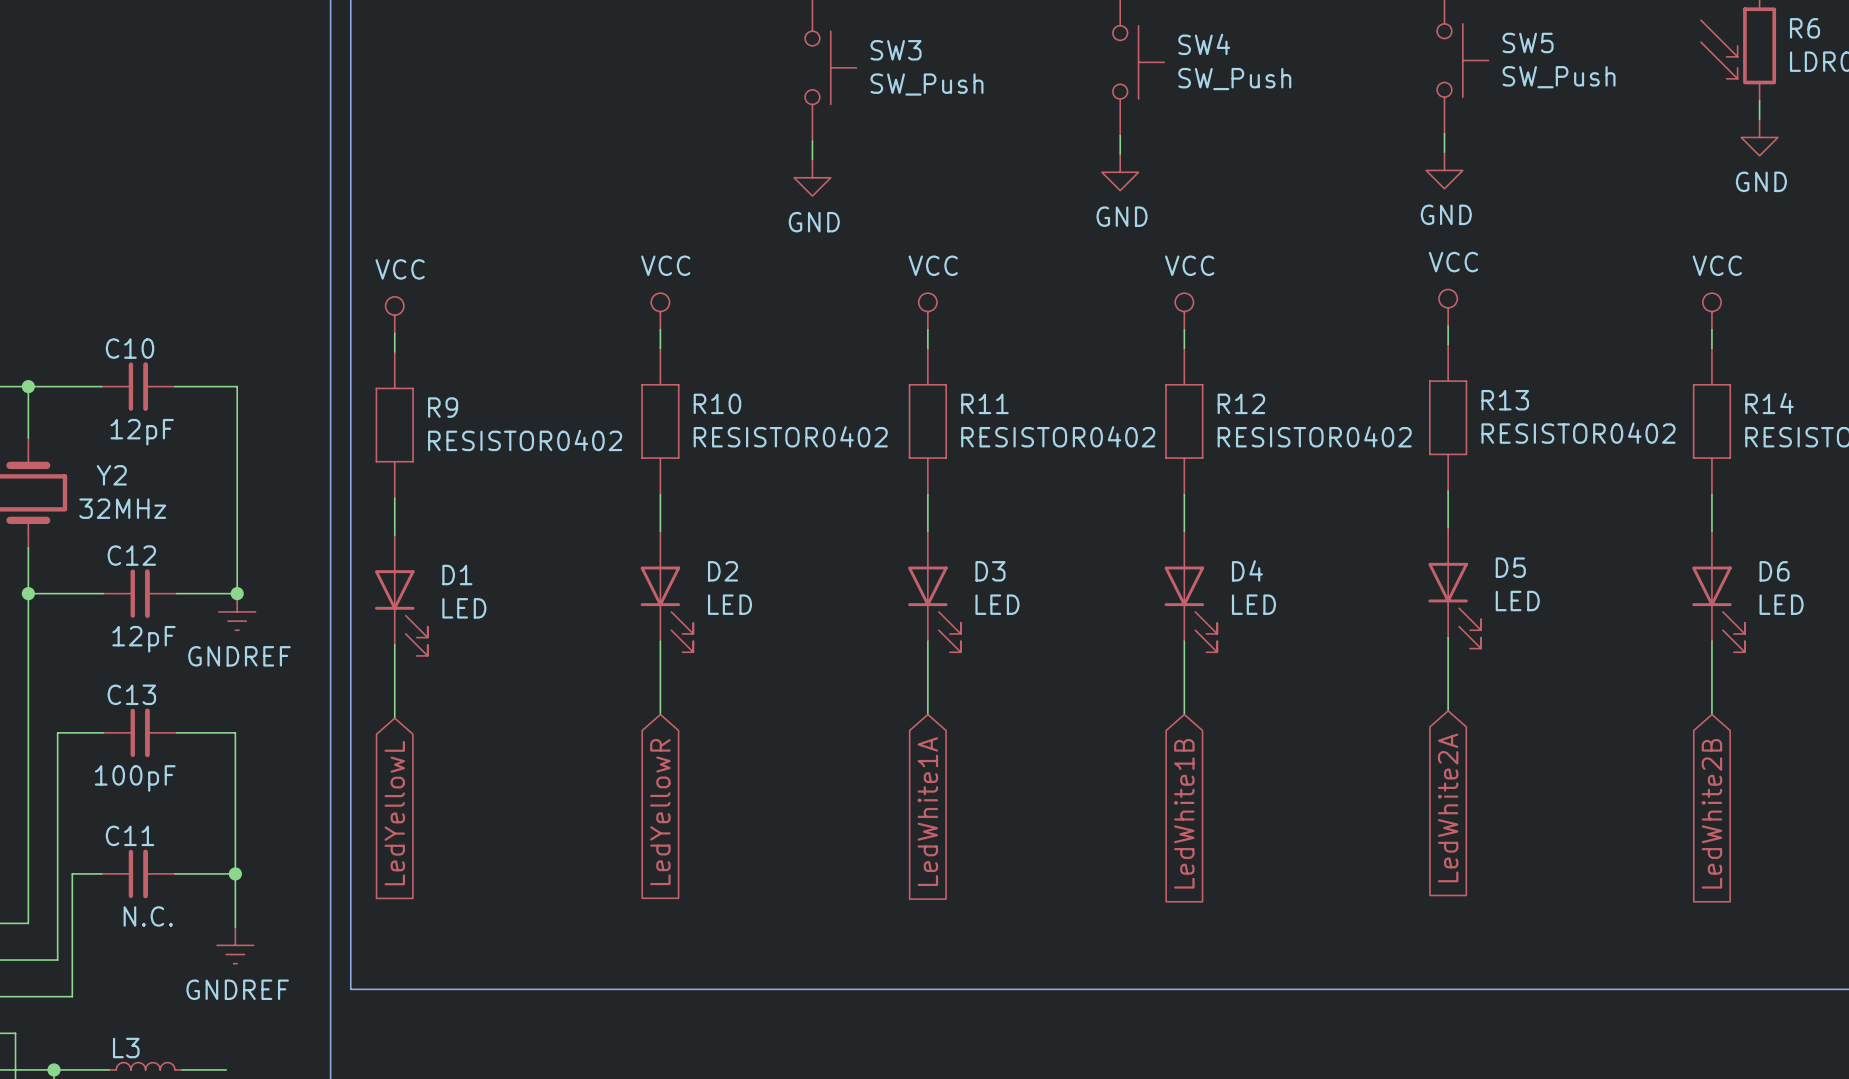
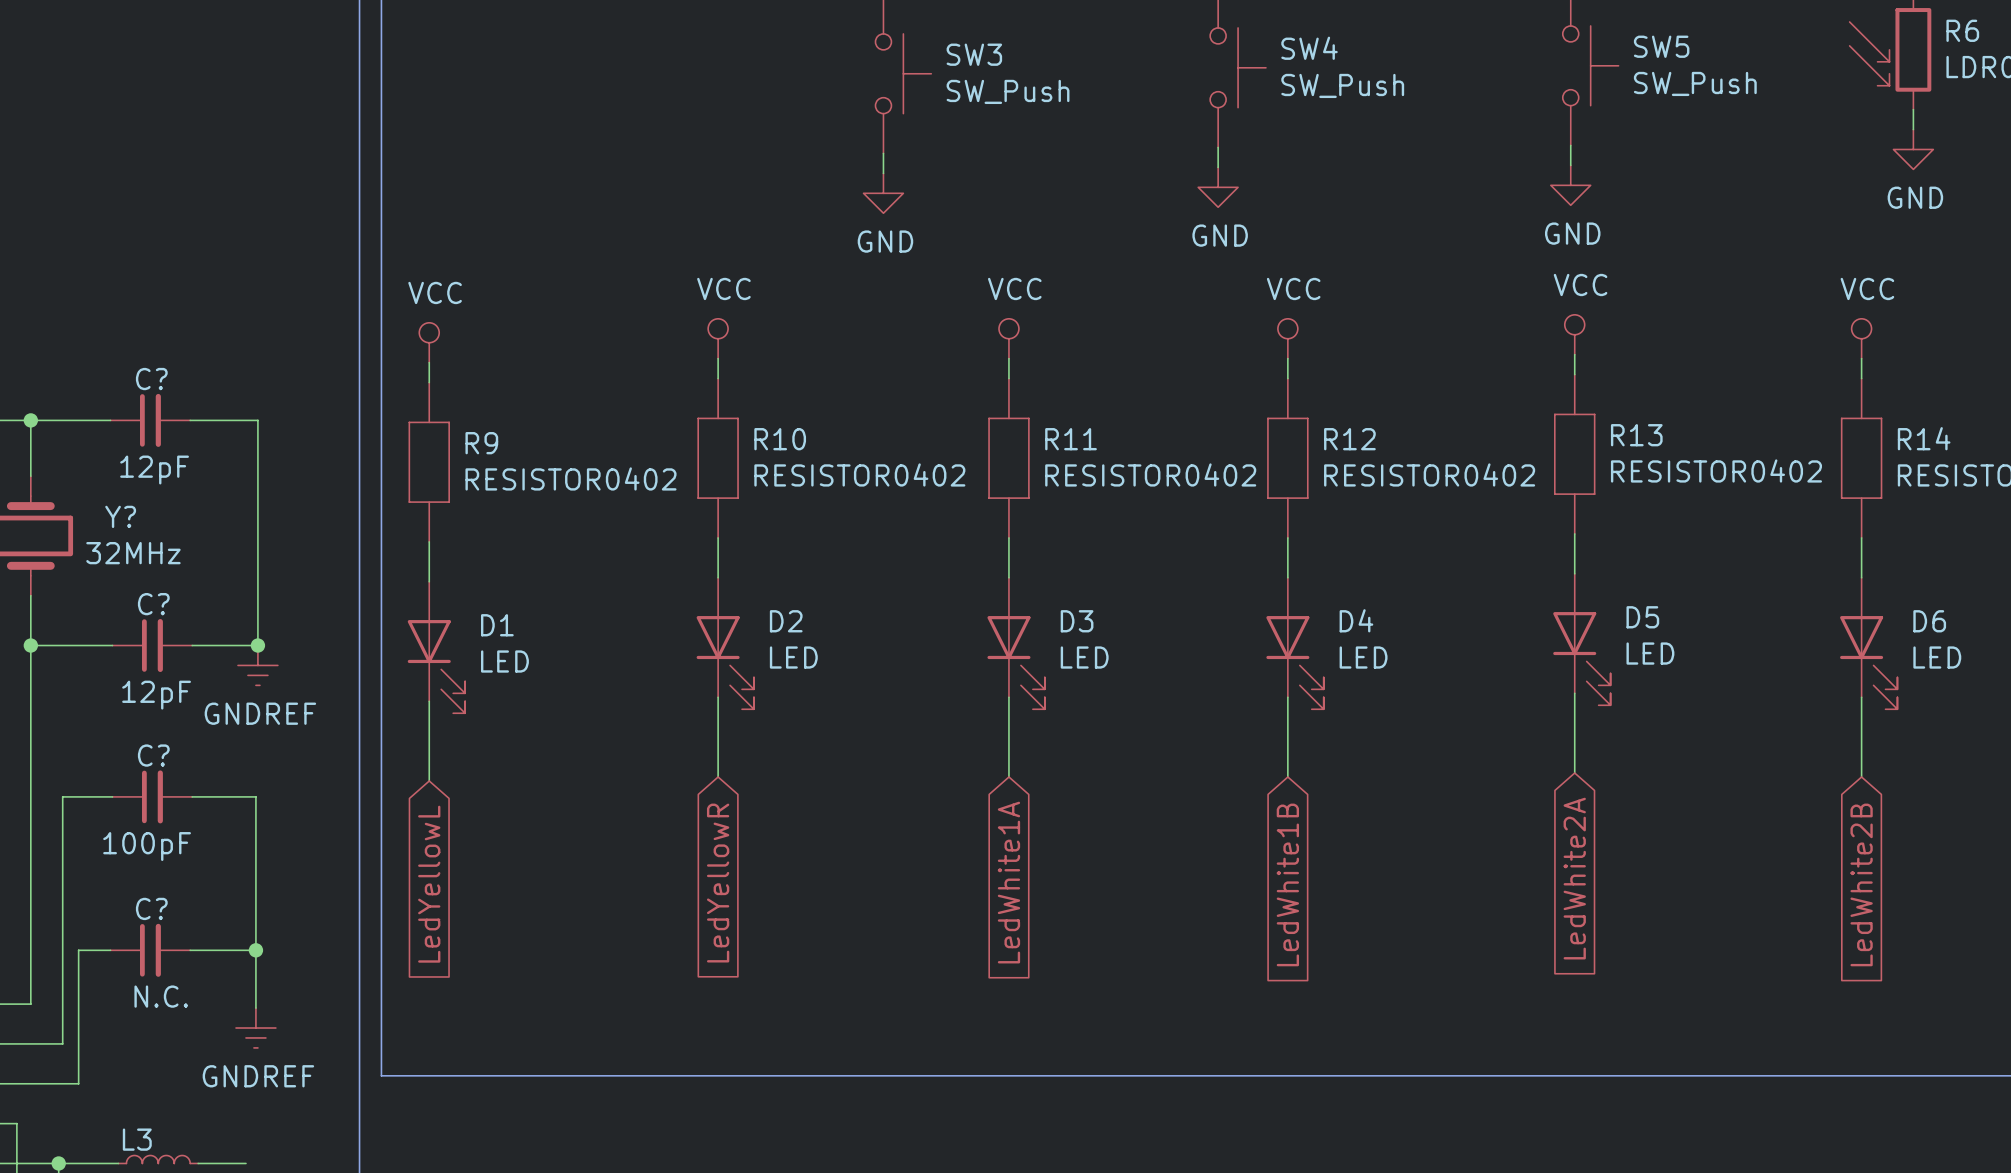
C10 name: C10 (130, 348) -> C? (151, 379)
Y2 name: Y2 (111, 475) -> Y? (120, 516)
C12 name: C12 (131, 555) -> C? (153, 604)
C13 name: C13 (131, 694) -> C? (153, 755)
C11 name: C11 (130, 835) -> C? (151, 908)

